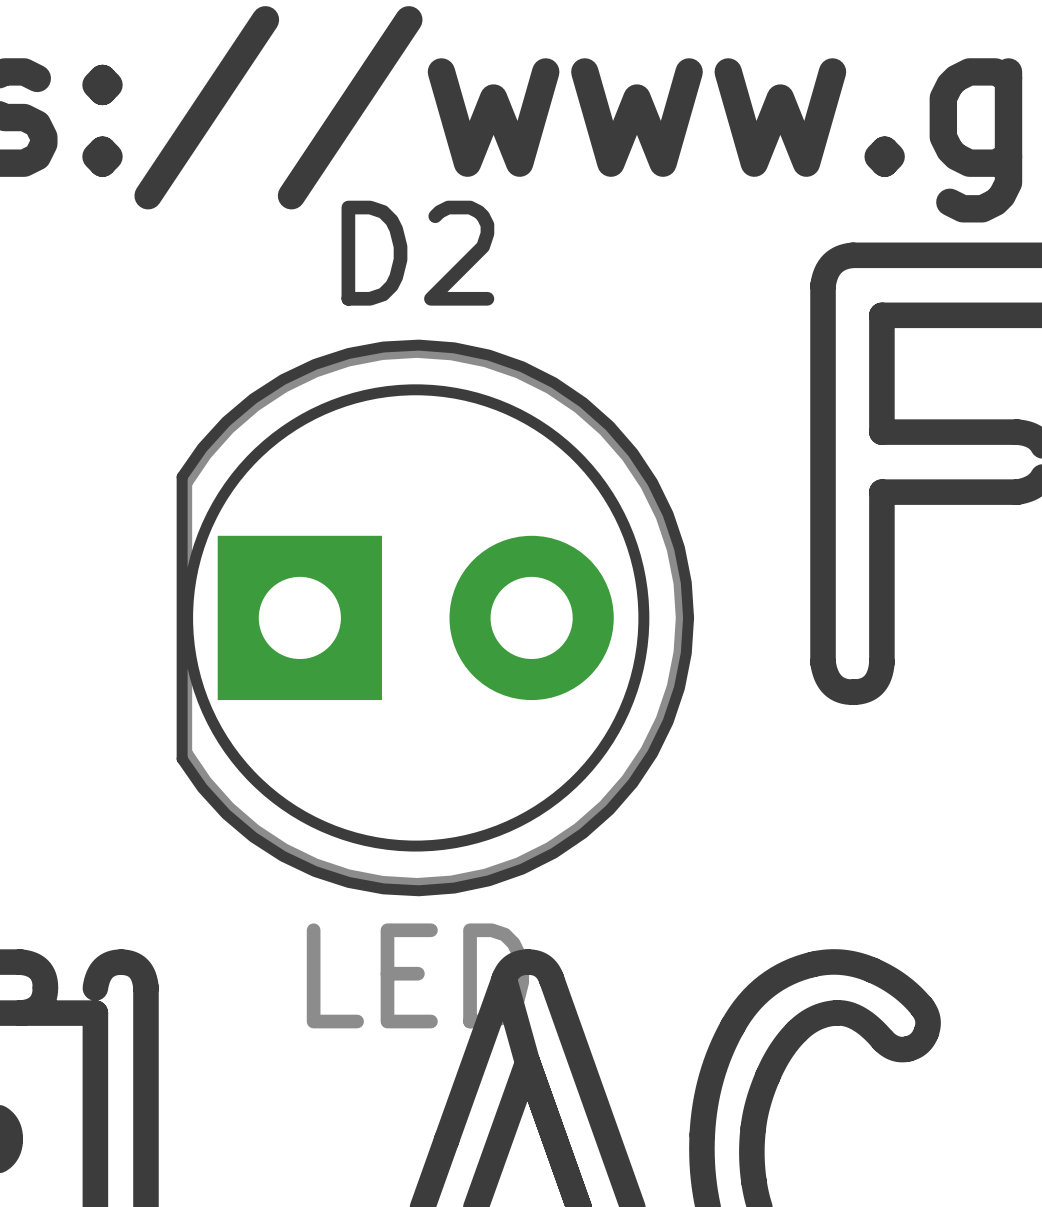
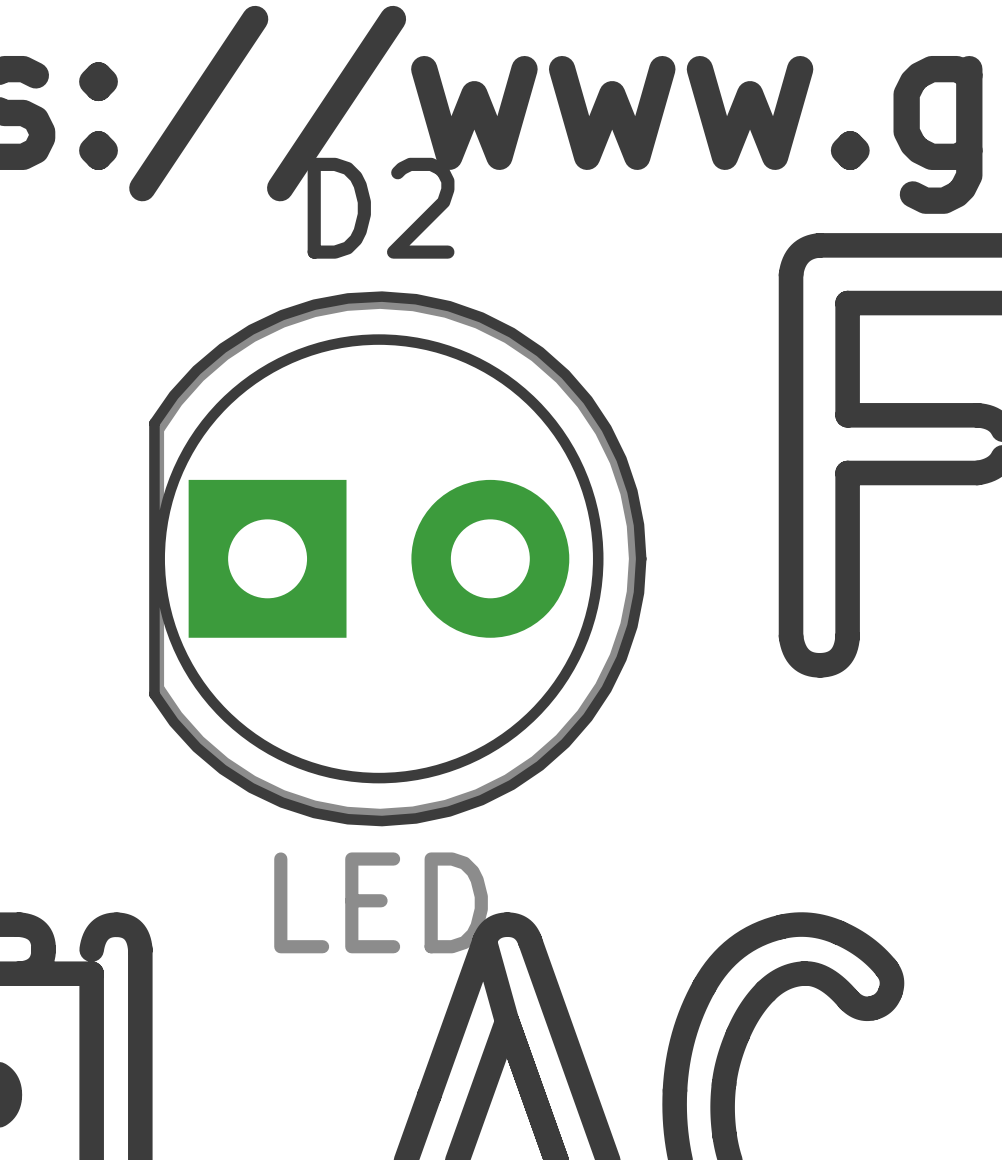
D2 position: (435, 617) -> (397, 558)

